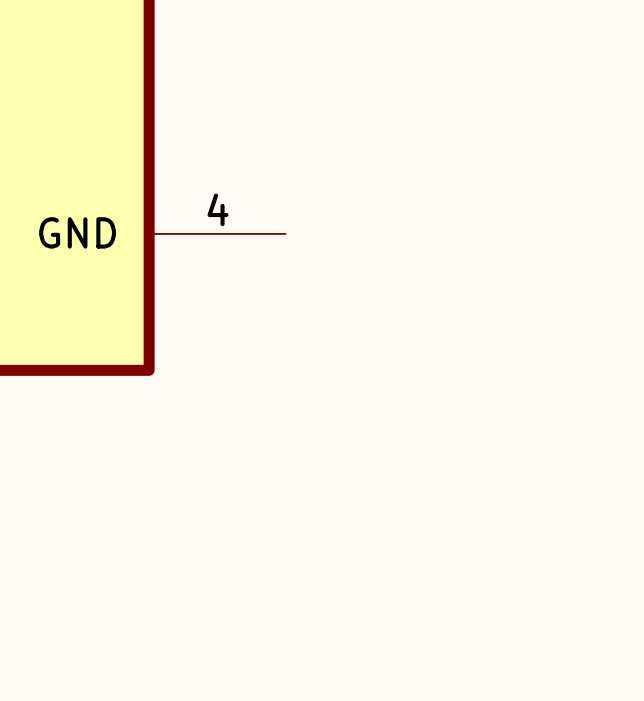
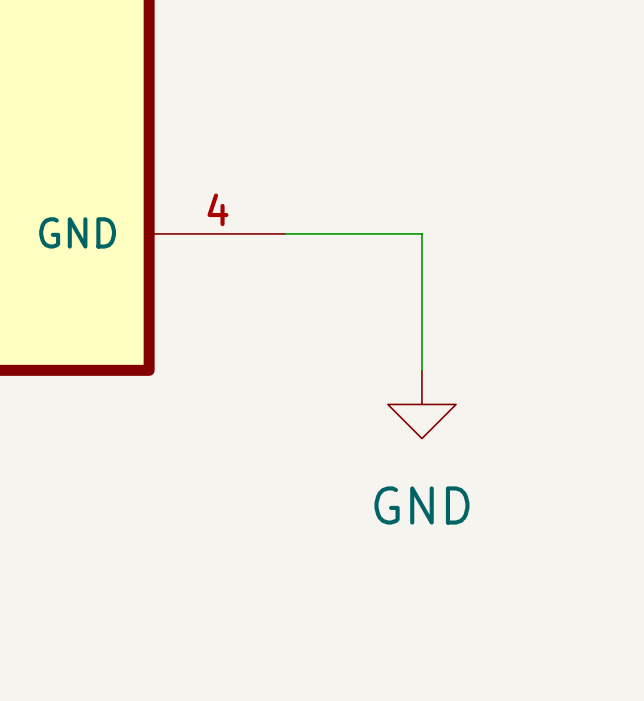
wire: none -> (285, 233) (421, 233) (421, 370)
power symbol: none -> GND (421, 404)

